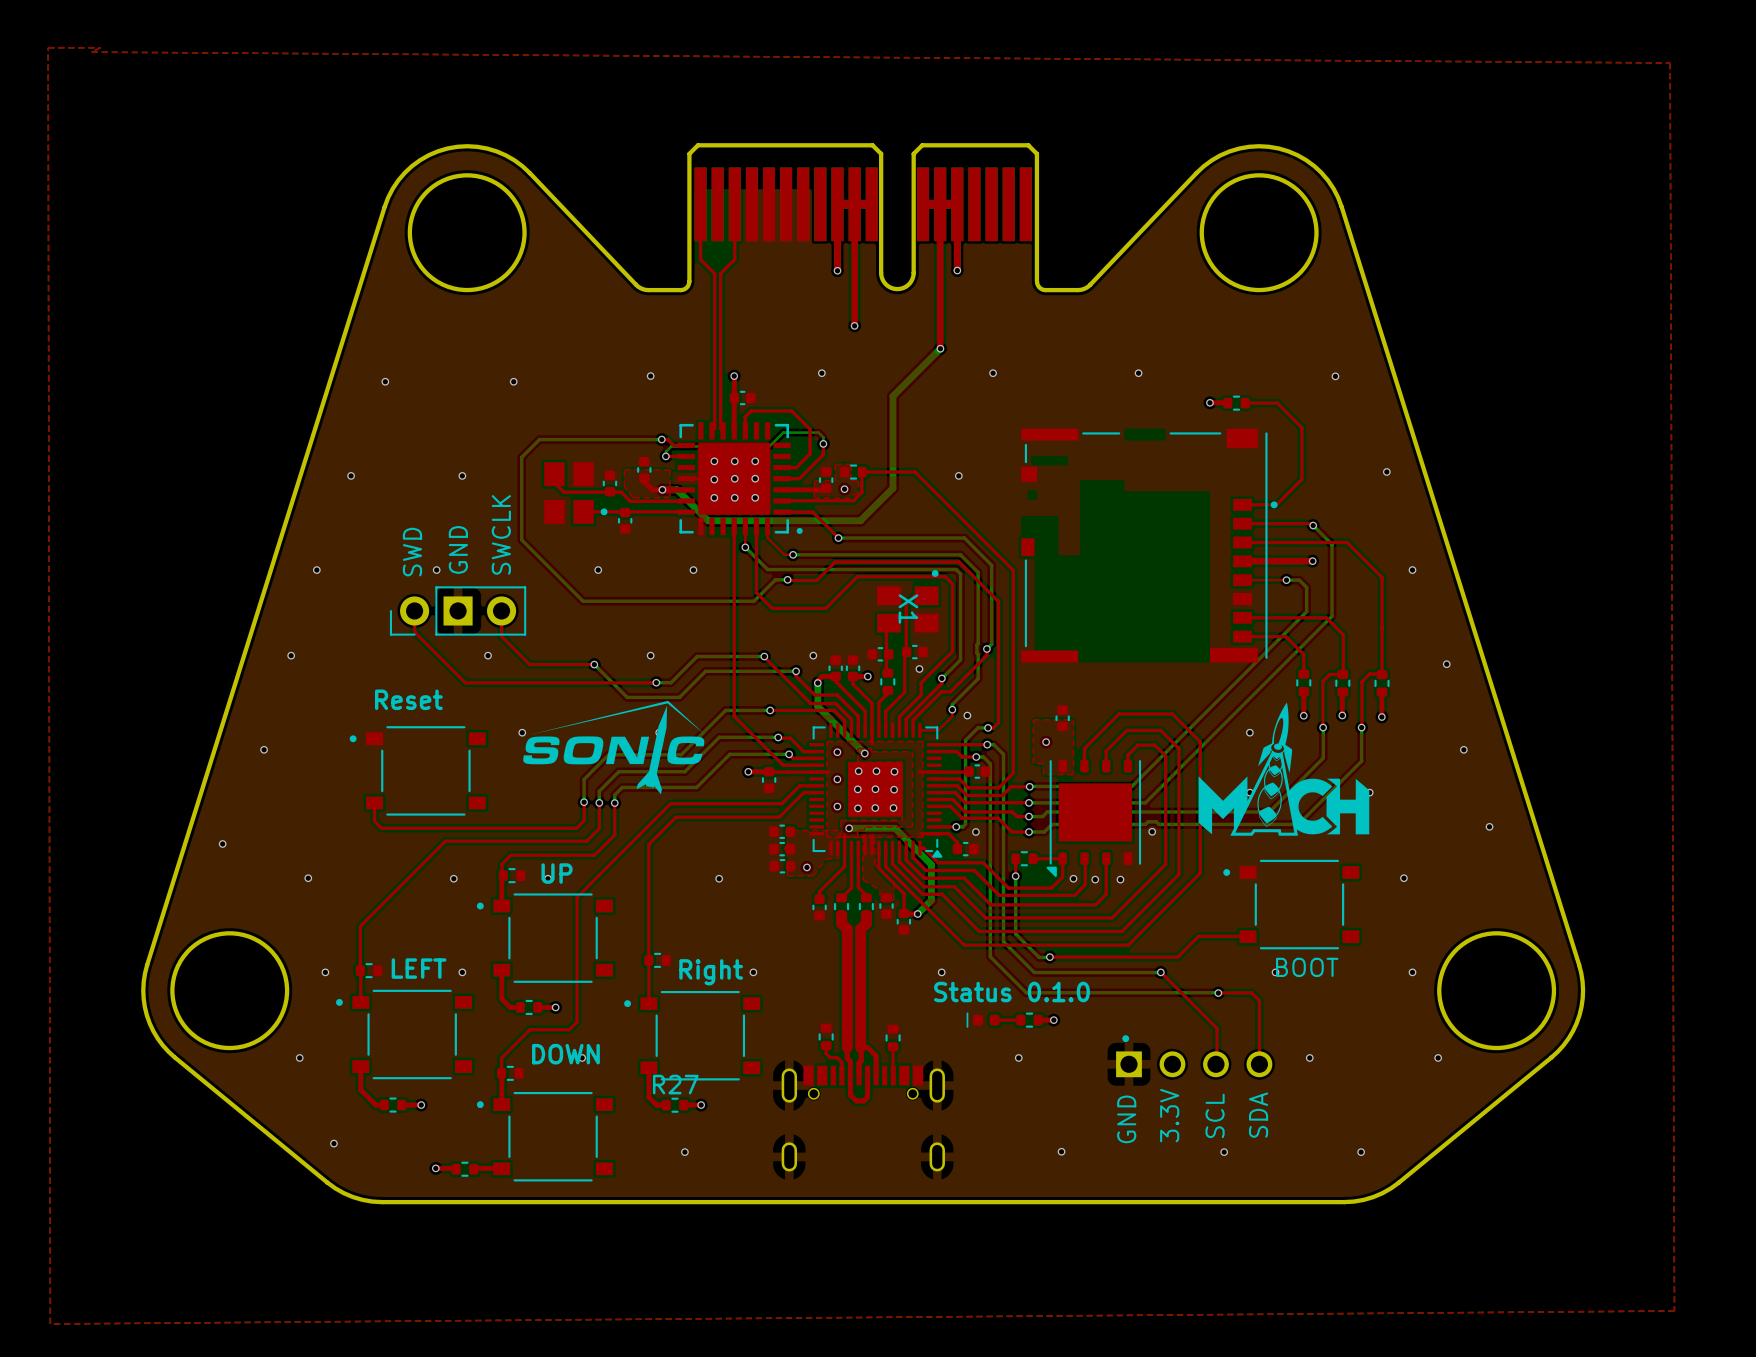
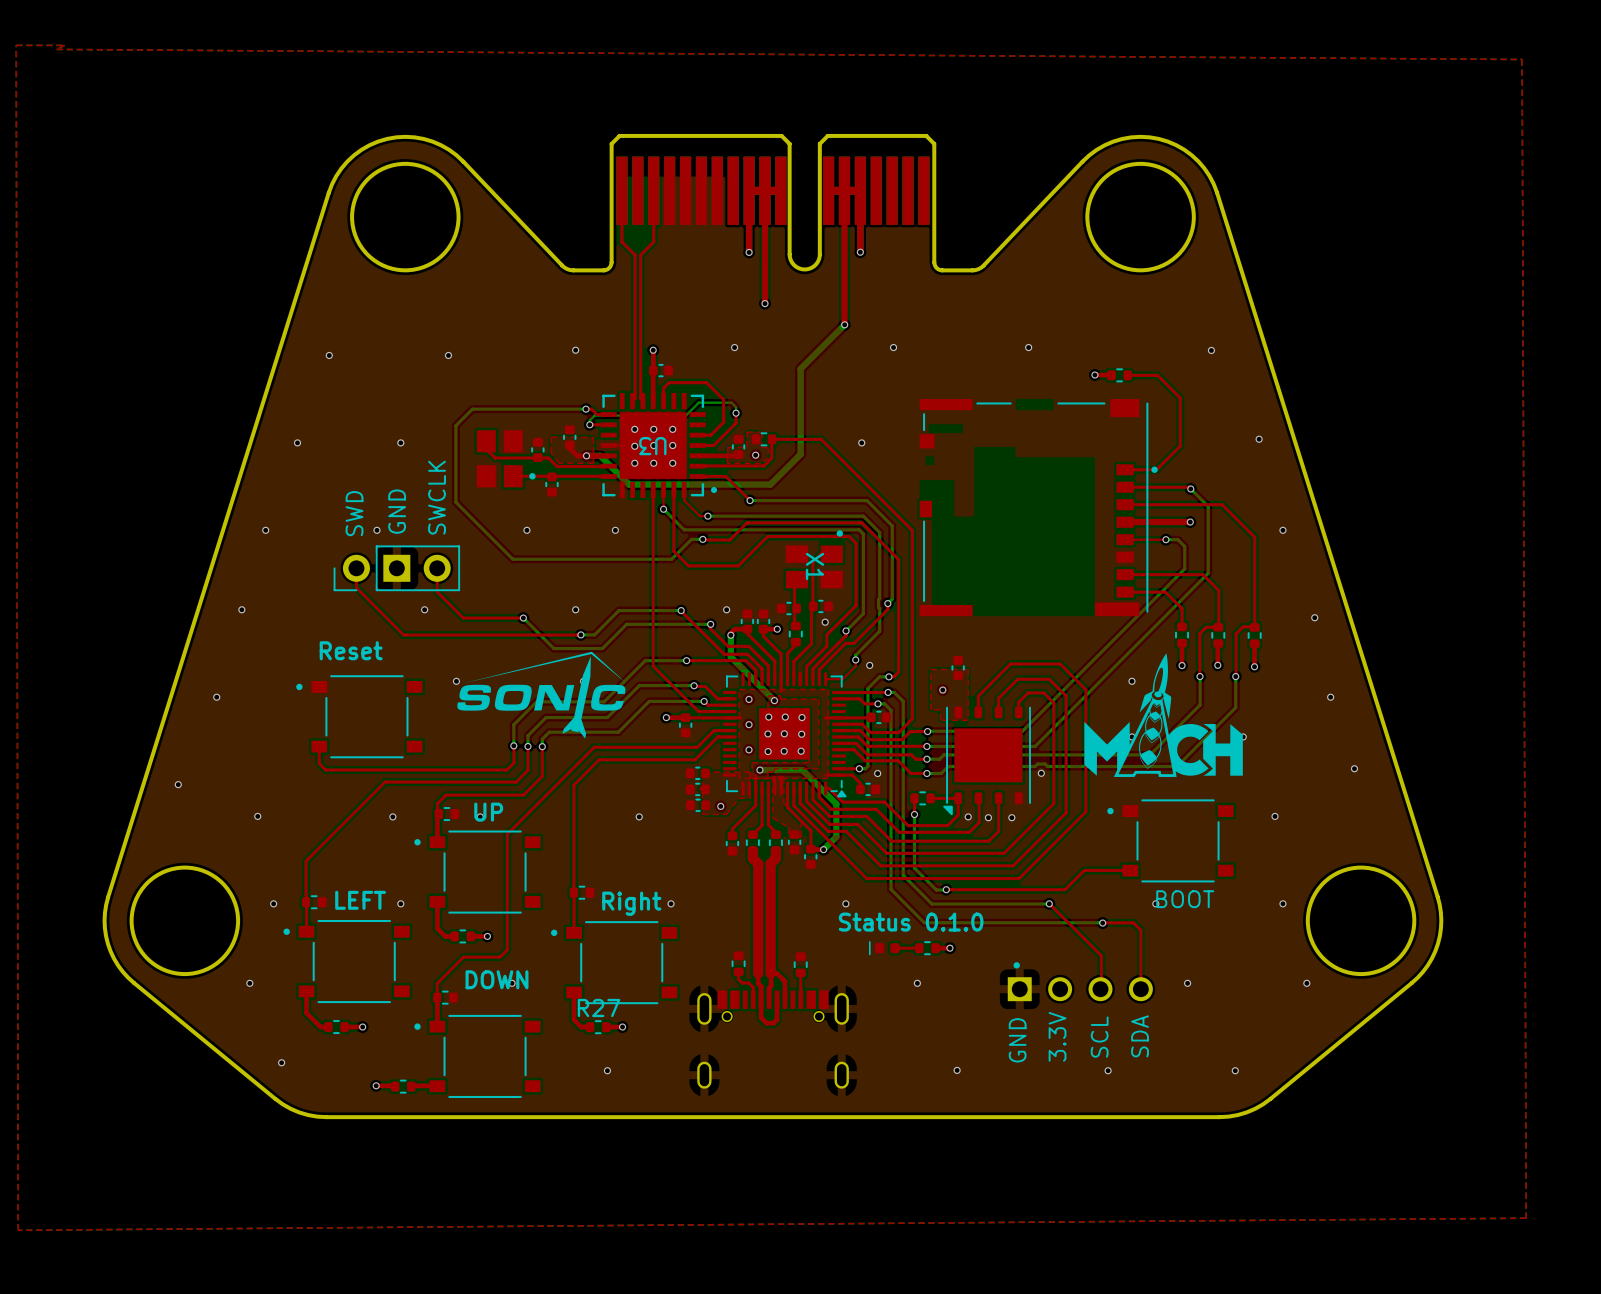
part: (740, 478) -> none
U3: none -> (658, 445)

